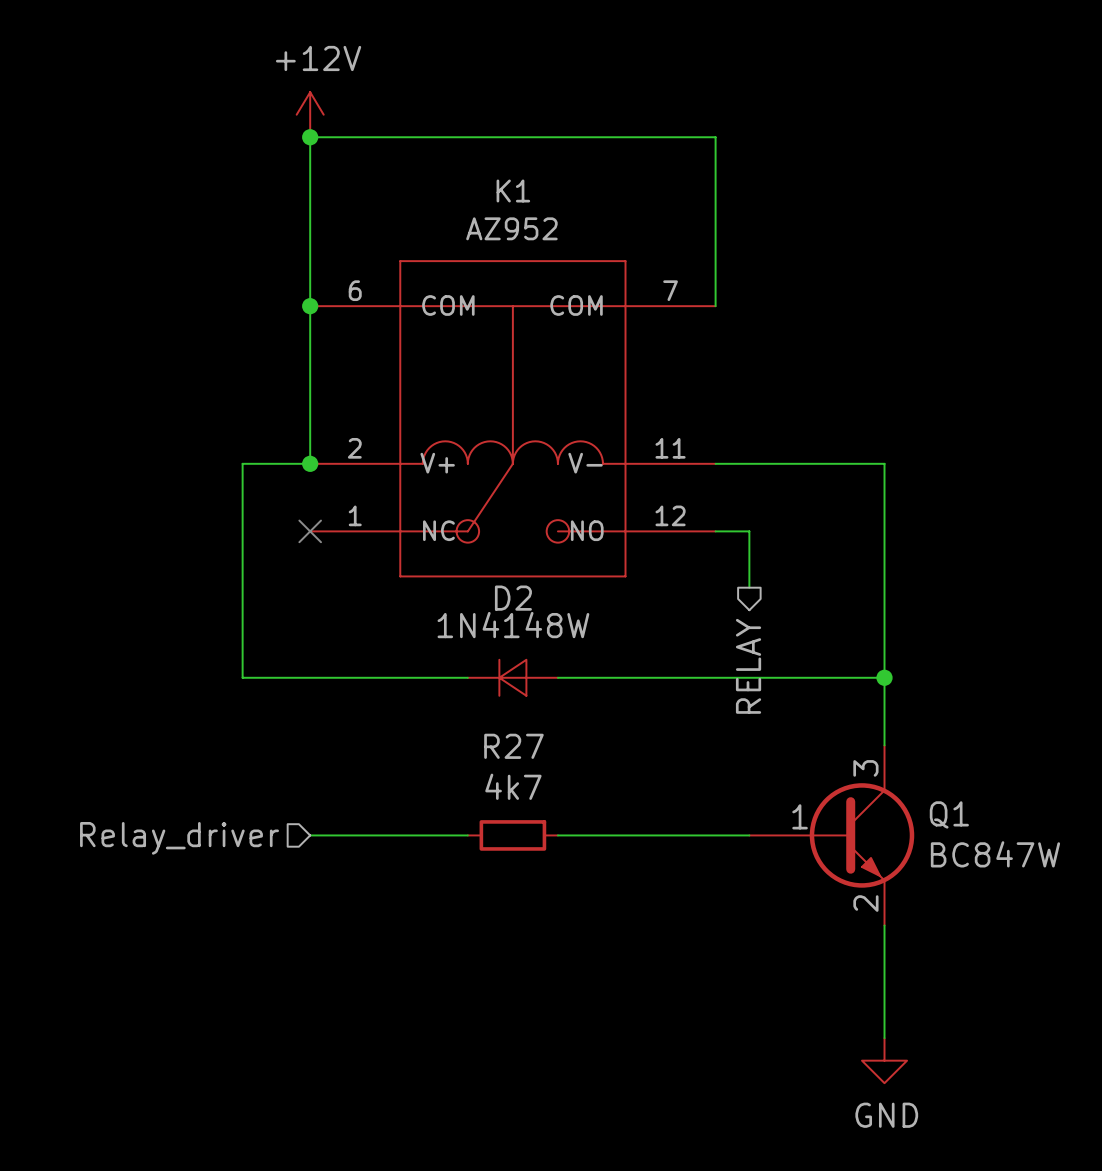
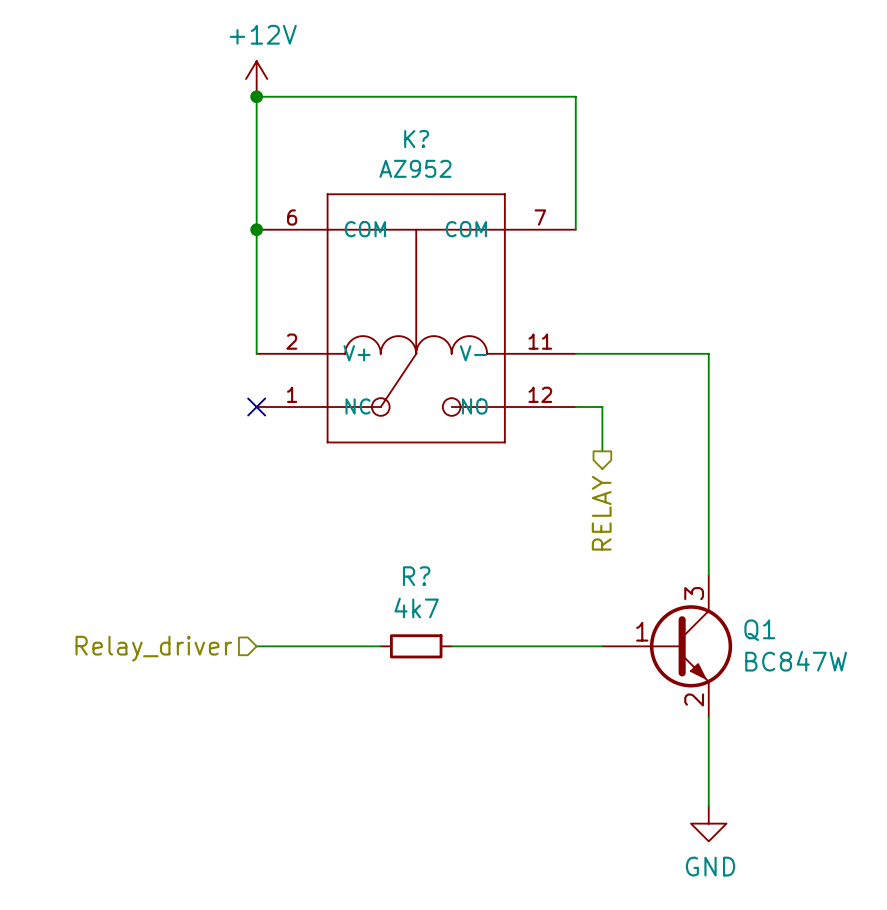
K1 name: K1 (513, 190) -> K? (416, 139)
wire: (310, 463) (242, 463) (242, 677) (467, 677) -> none
junction: (310, 463) -> none
D2: 1N4148W (512, 677) -> none
wire: (557, 677) (884, 677) -> none
junction: (884, 677) -> none
R27 name: R27 (513, 746) -> R? (416, 576)

